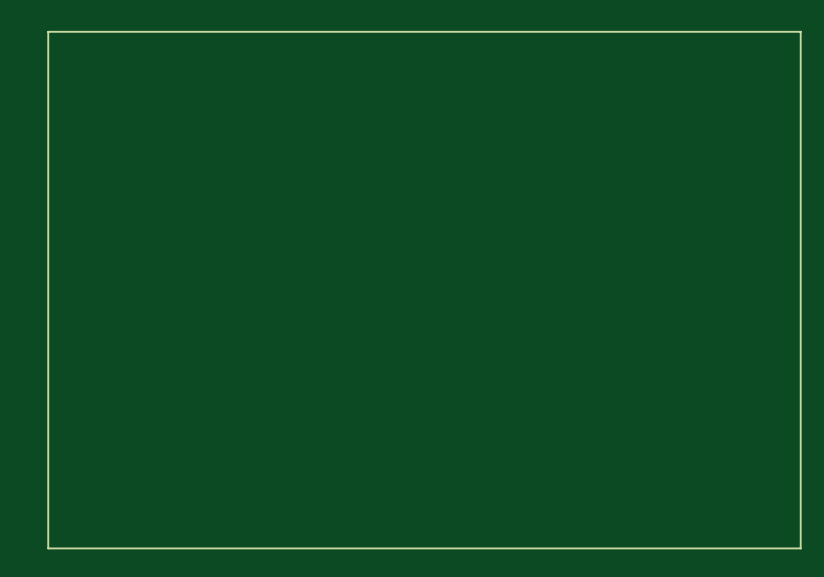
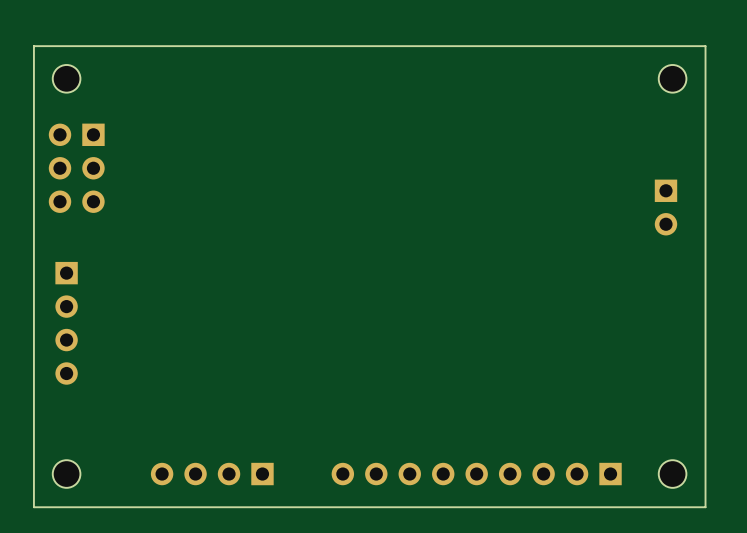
part: none -> (66, 78)
part: none -> (672, 78)
part: none -> (76, 168)
part: none -> (665, 207)
part: none -> (66, 323)
part: none -> (66, 474)
part: none -> (212, 474)
part: none -> (476, 474)
part: none -> (672, 474)

